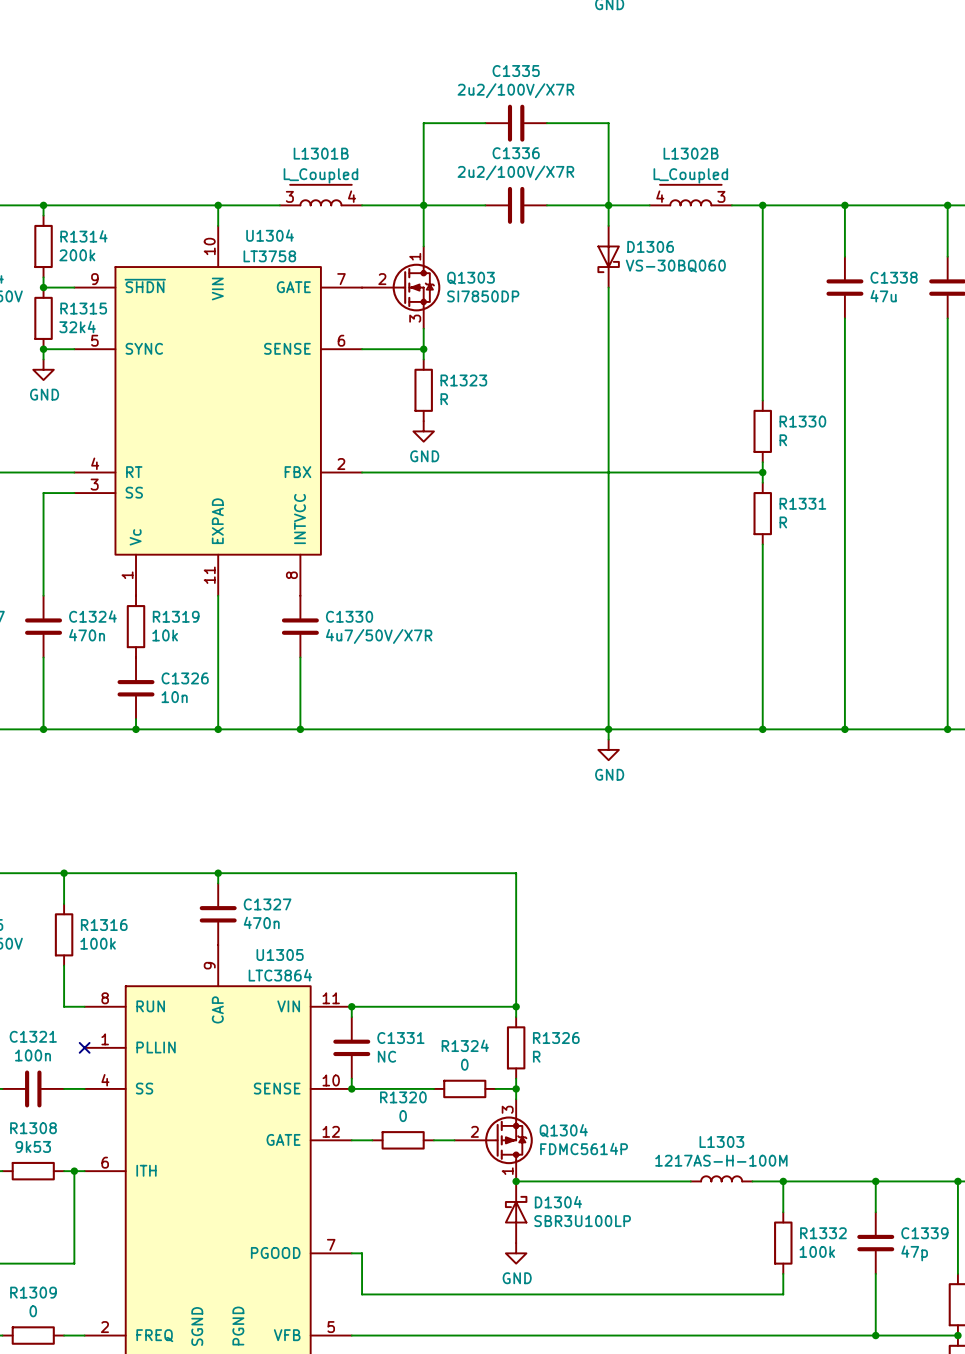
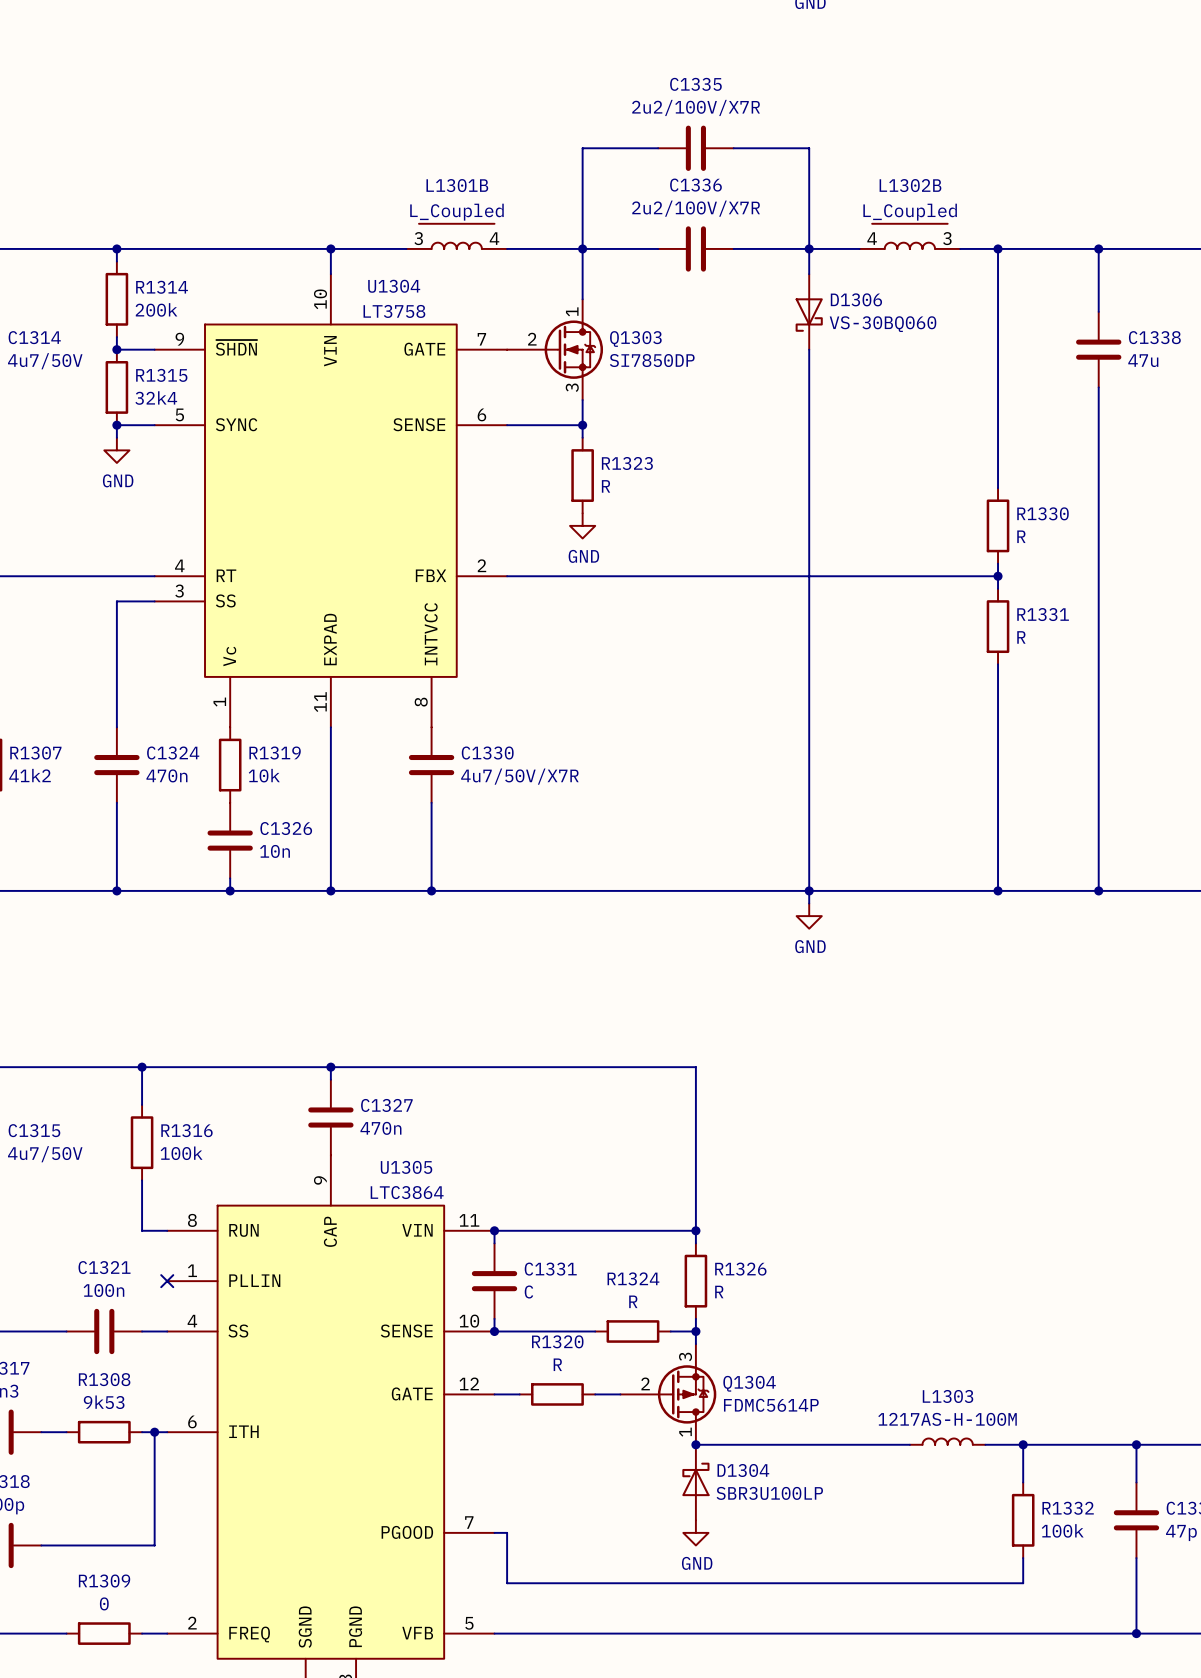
C1331 value: NC (386, 1056) -> C (528, 1292)
R1324 value: 0 (464, 1064) -> R (633, 1301)
R1320 value: 0 (403, 1116) -> R (557, 1364)

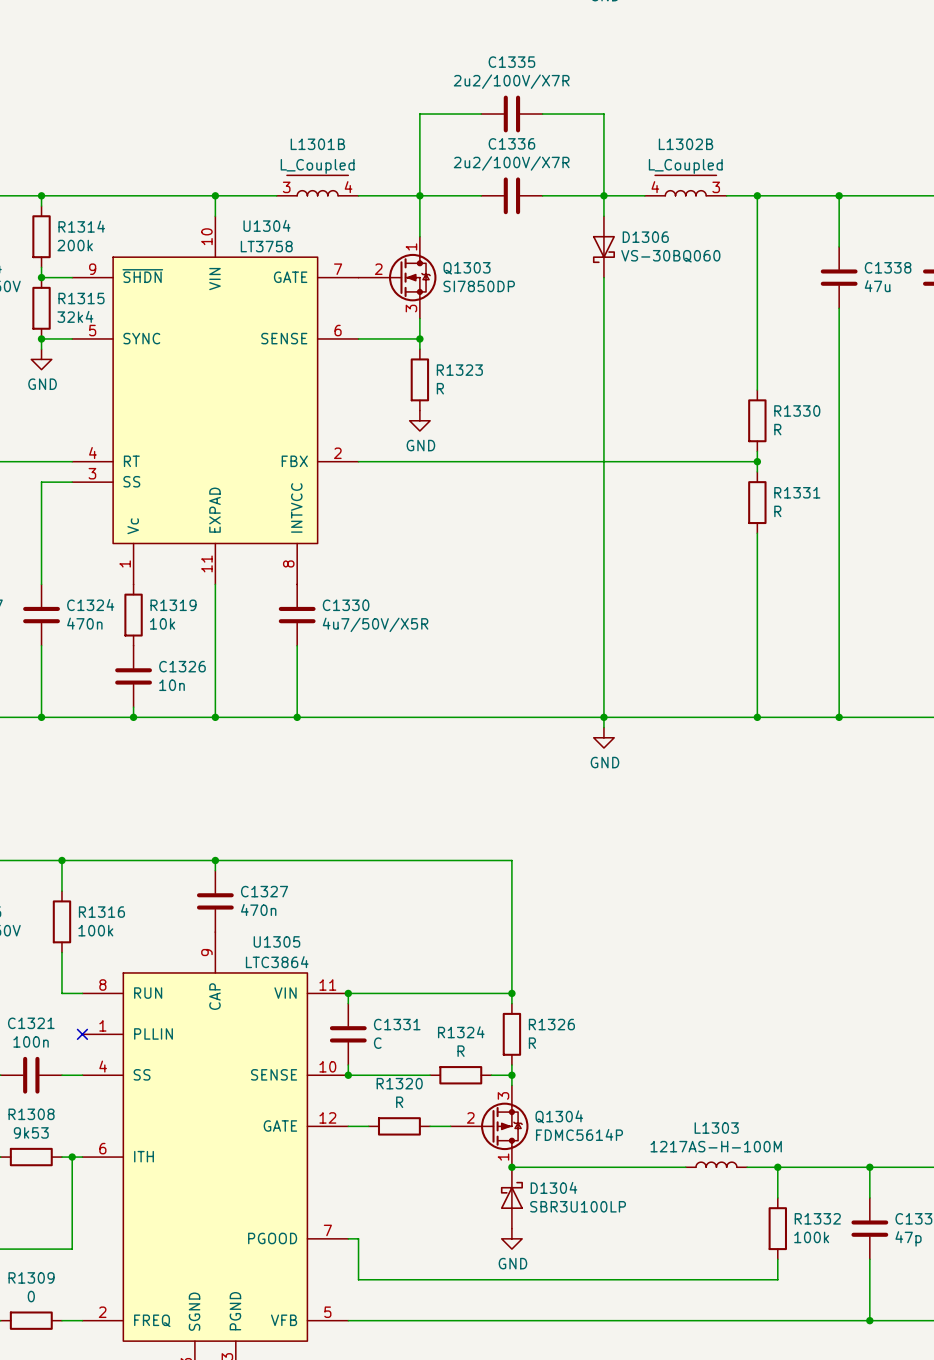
C1330 value: 4u7/50V/X7R (519, 776) -> 4u7/50V/X5R (375, 624)

